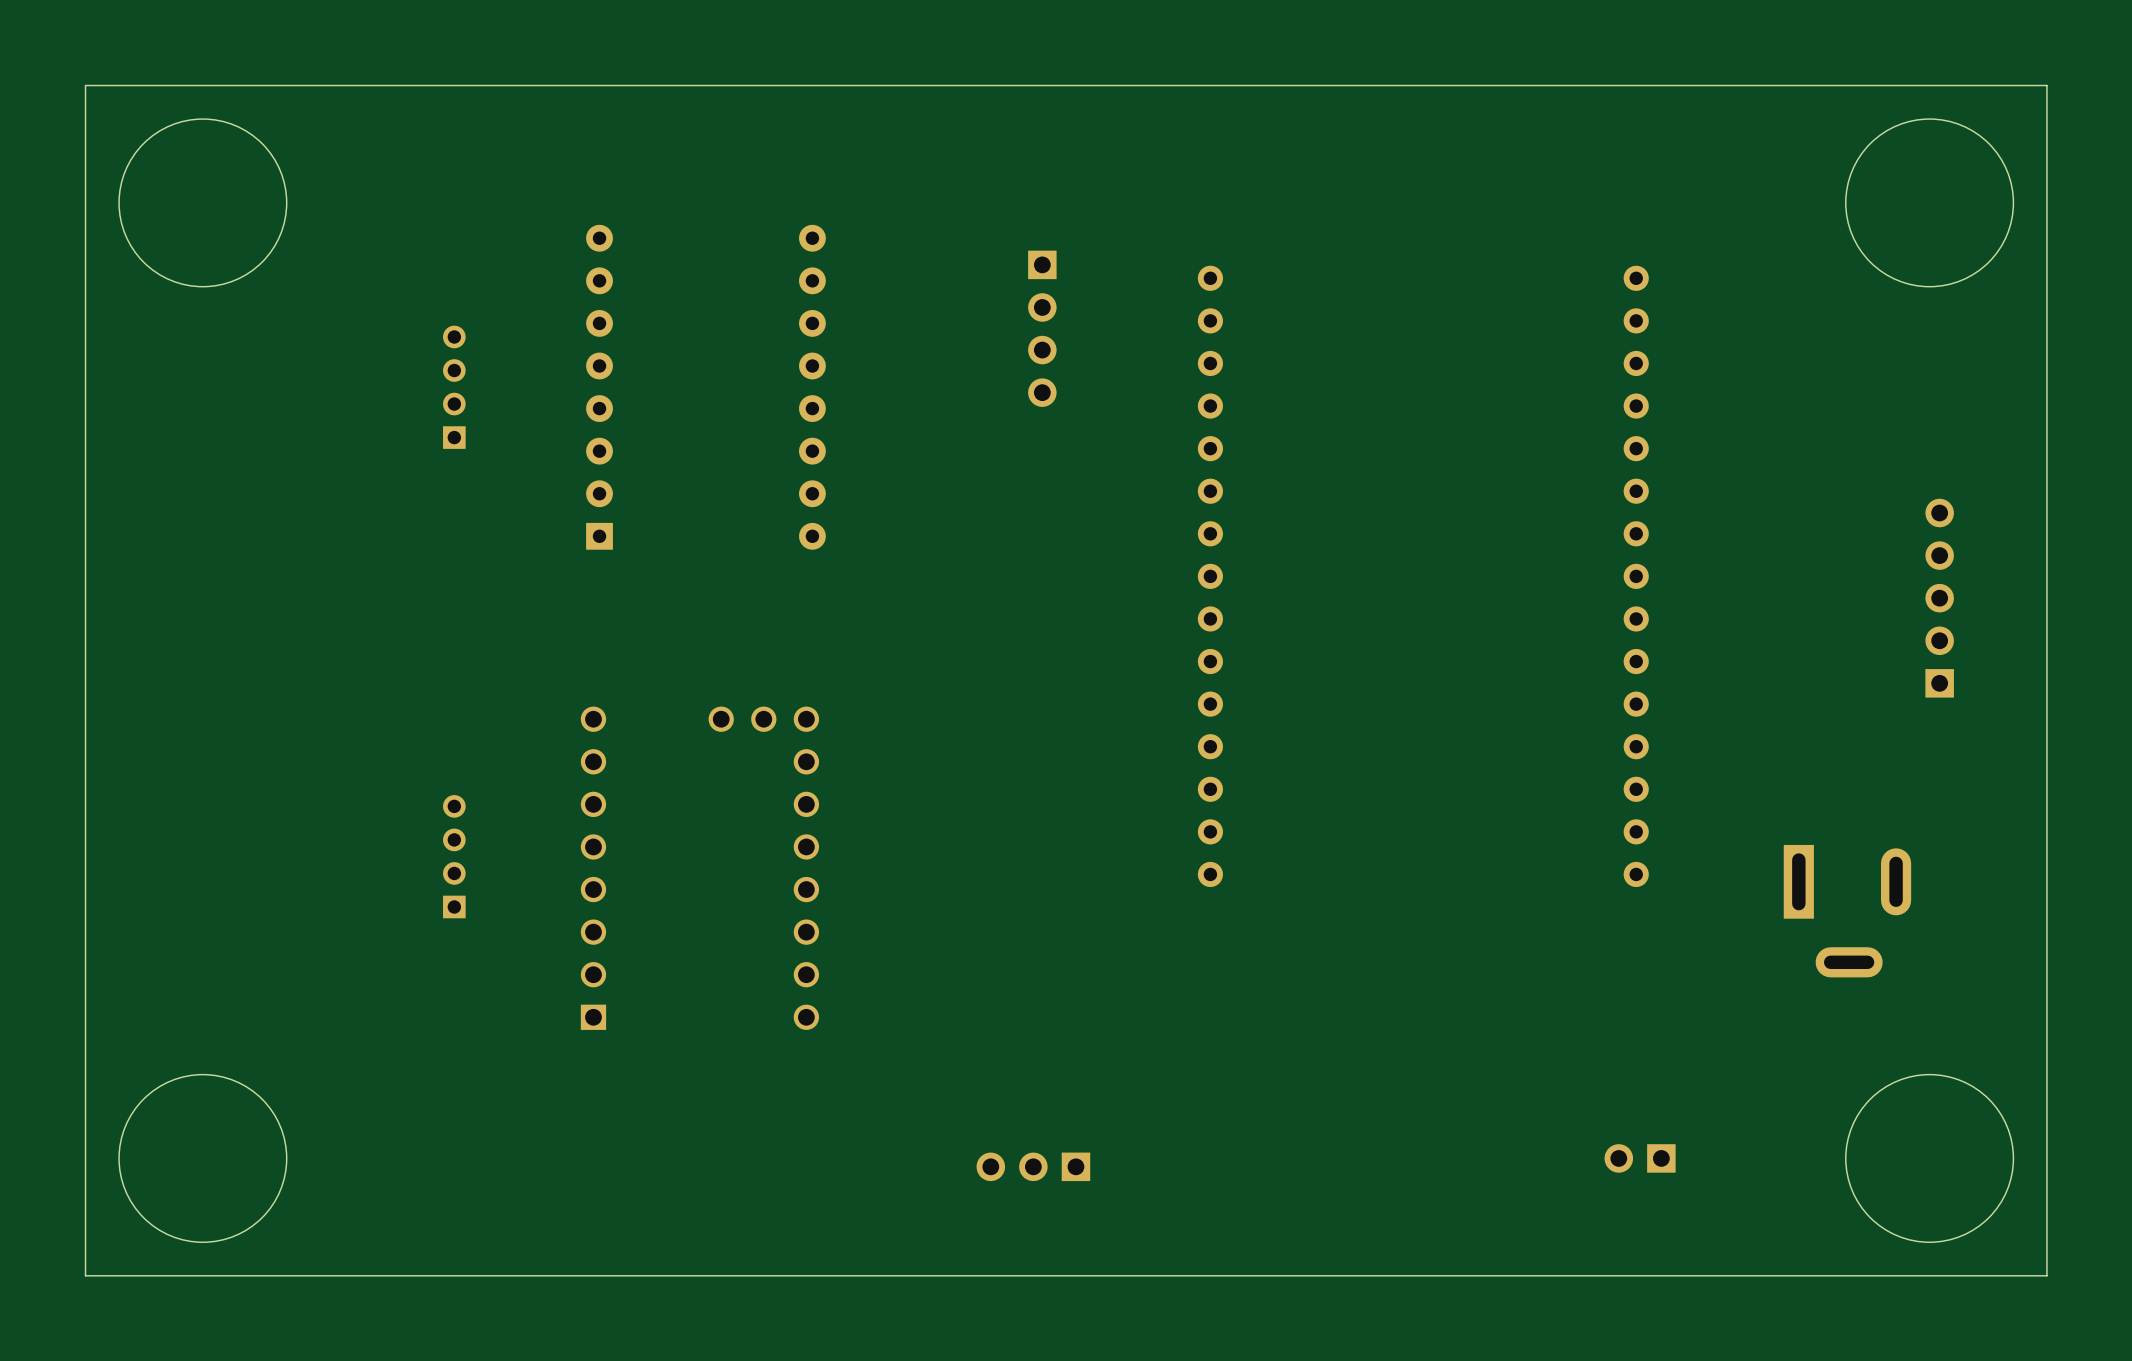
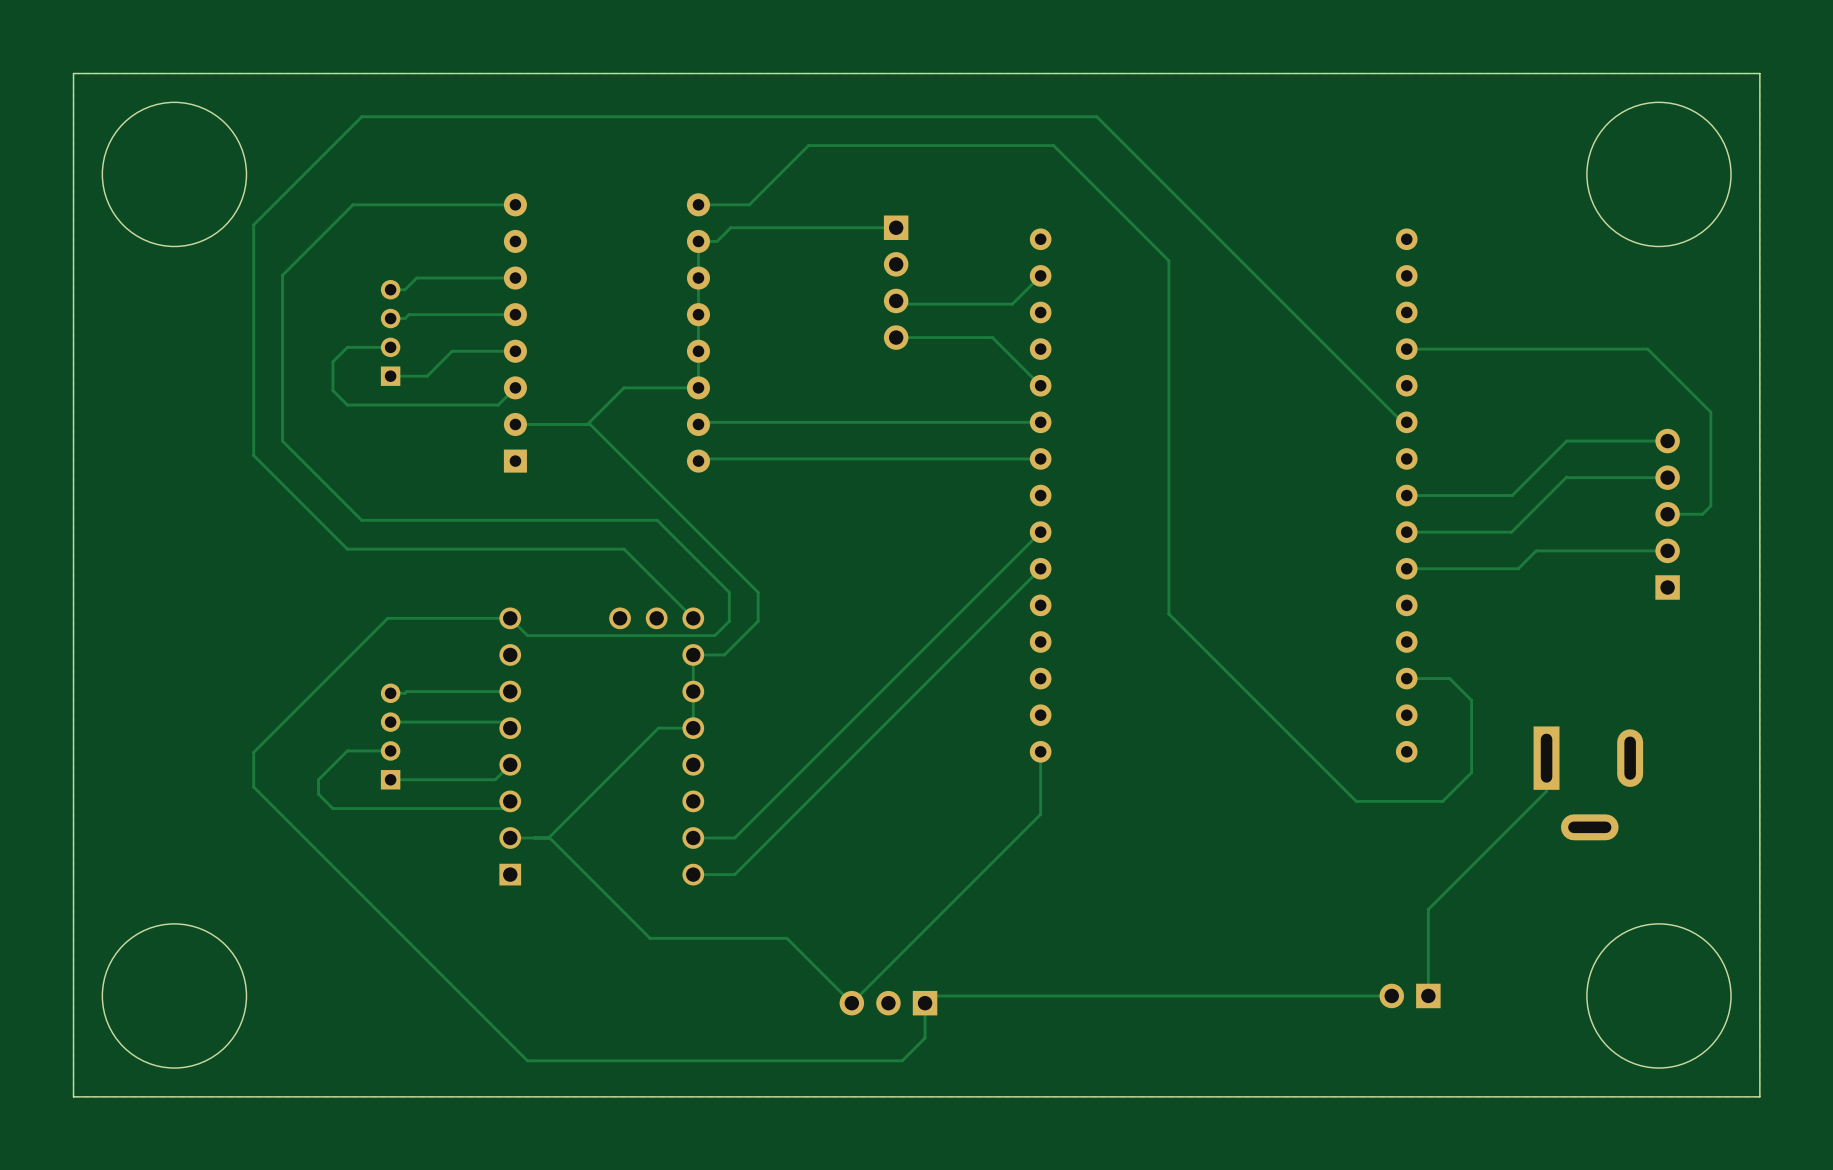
track: none -> (515, 204) (352, 204) (282, 275) (282, 441) (361, 520) (657, 520) (729, 592) (729, 621) (714, 635) (527, 635) (510, 618) (387, 618) (253, 752) (253, 786) (527, 1060) (902, 1060) (925, 1038) (925, 1003) (932, 995) (1391, 995)
track: none -> (698, 204) (749, 204) (808, 145) (1053, 145) (1168, 260) (1168, 614) (1356, 801) (1442, 801) (1471, 772) (1471, 700) (1449, 678) (1406, 678)
track: none -> (896, 227) (730, 227) (717, 241) (698, 241) (698, 387) (623, 387) (587, 424)
track: none -> (1040, 275) (1012, 304) (899, 304) (896, 300)
track: none -> (515, 278) (416, 278) (405, 289) (390, 289)
track: none -> (515, 314) (408, 314) (405, 318) (390, 318)
track: none -> (898, 340) (896, 337) (992, 337) (1040, 385)
track: none -> (390, 347) (347, 347) (332, 361) (332, 390) (347, 405) (498, 405) (515, 387)
track: none -> (1406, 349) (1647, 349) (1710, 412) (1710, 505) (1702, 514) (1667, 514)
track: none -> (515, 351) (452, 351) (427, 376) (390, 376)
track: none -> (1040, 422) (700, 422) (698, 424)
track: none -> (1406, 422) (1402, 422) (1096, 116) (361, 116) (253, 224) (253, 455) (347, 549) (624, 549) (693, 618)
track: none -> (515, 424) (590, 424) (758, 592) (758, 621) (724, 654) (693, 654) (693, 728) (658, 728) (548, 837)
track: none -> (1667, 441) (1566, 441) (1512, 495) (1406, 495)
track: none -> (1040, 458) (700, 458) (698, 461)
track: none -> (1667, 477) (1566, 477) (1511, 532) (1406, 532)
track: none -> (1040, 532) (734, 837) (693, 837)
track: none -> (1667, 550) (1536, 550) (1518, 568) (1406, 568)
track: none -> (1040, 568) (734, 874) (693, 874)
track: none -> (510, 691) (390, 693)
track: none -> (390, 722) (504, 722) (510, 728)
track: none -> (390, 750) (347, 750) (318, 779) (318, 794) (332, 808) (503, 808) (510, 801)
track: none -> (1040, 751) (1040, 814) (851, 1003) (786, 938) (650, 938) (549, 837) (510, 837)
track: none -> (1546, 758) (1546, 791) (1428, 909) (1428, 995)
track: none -> (510, 764) (495, 779) (390, 779)

